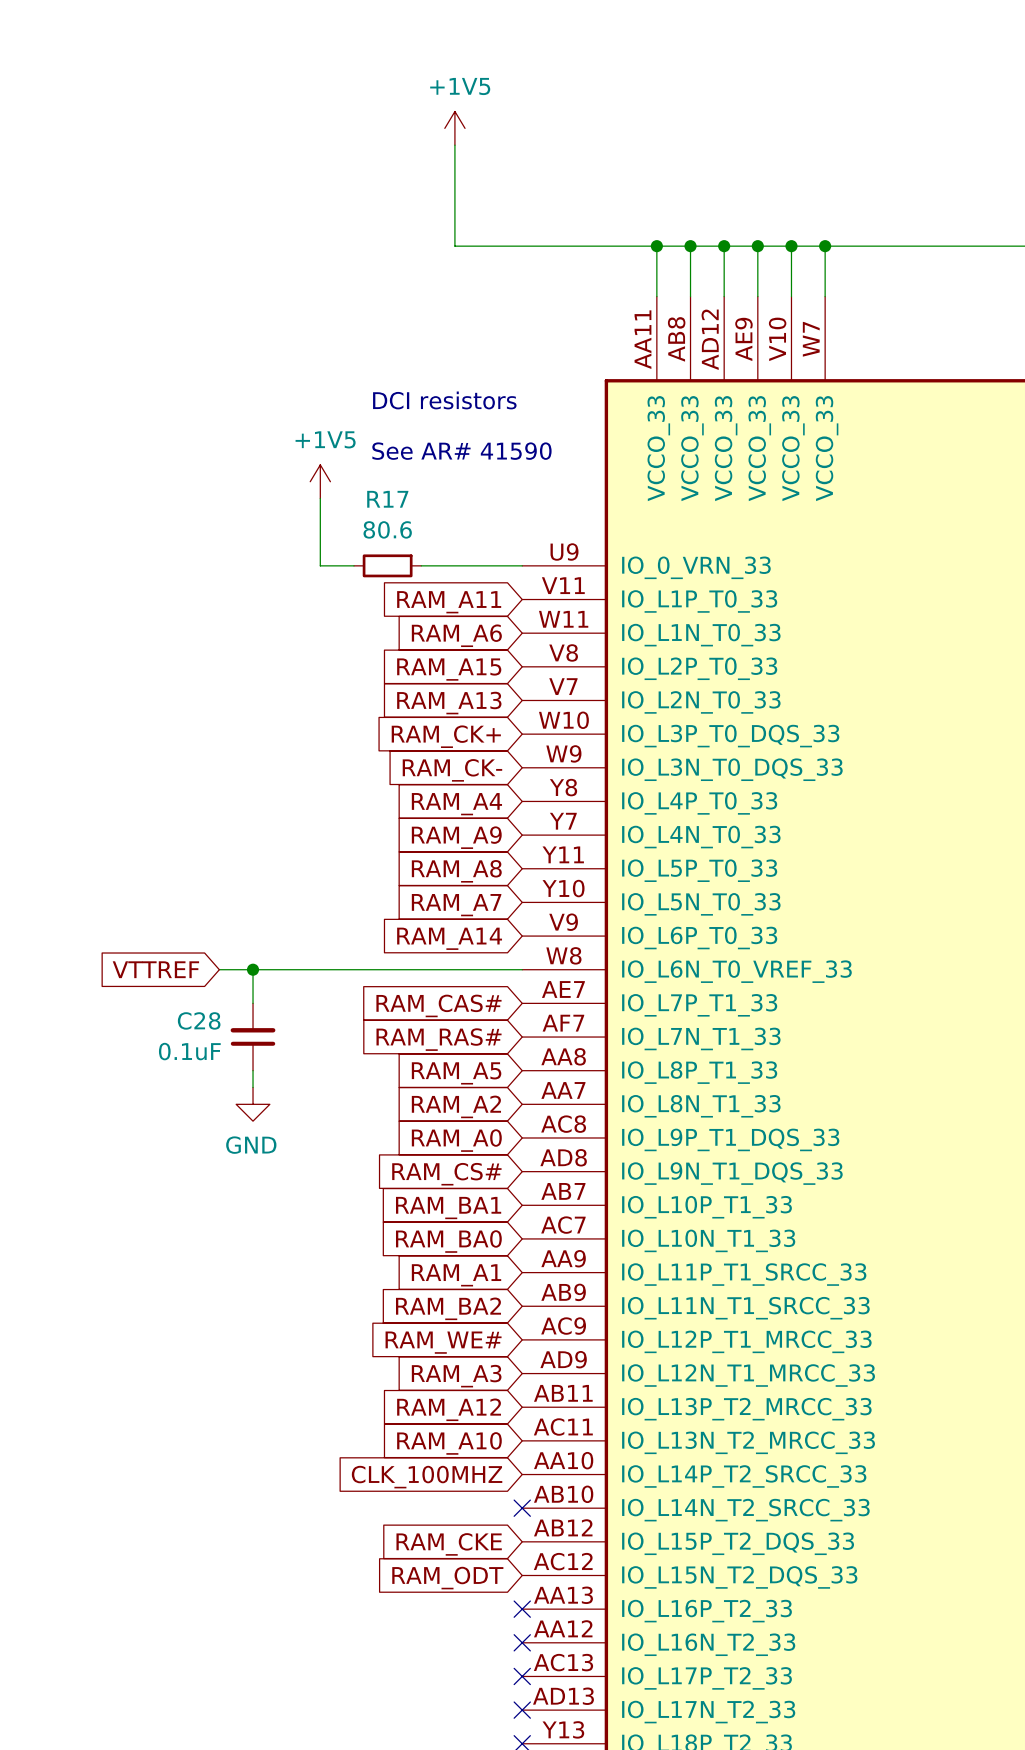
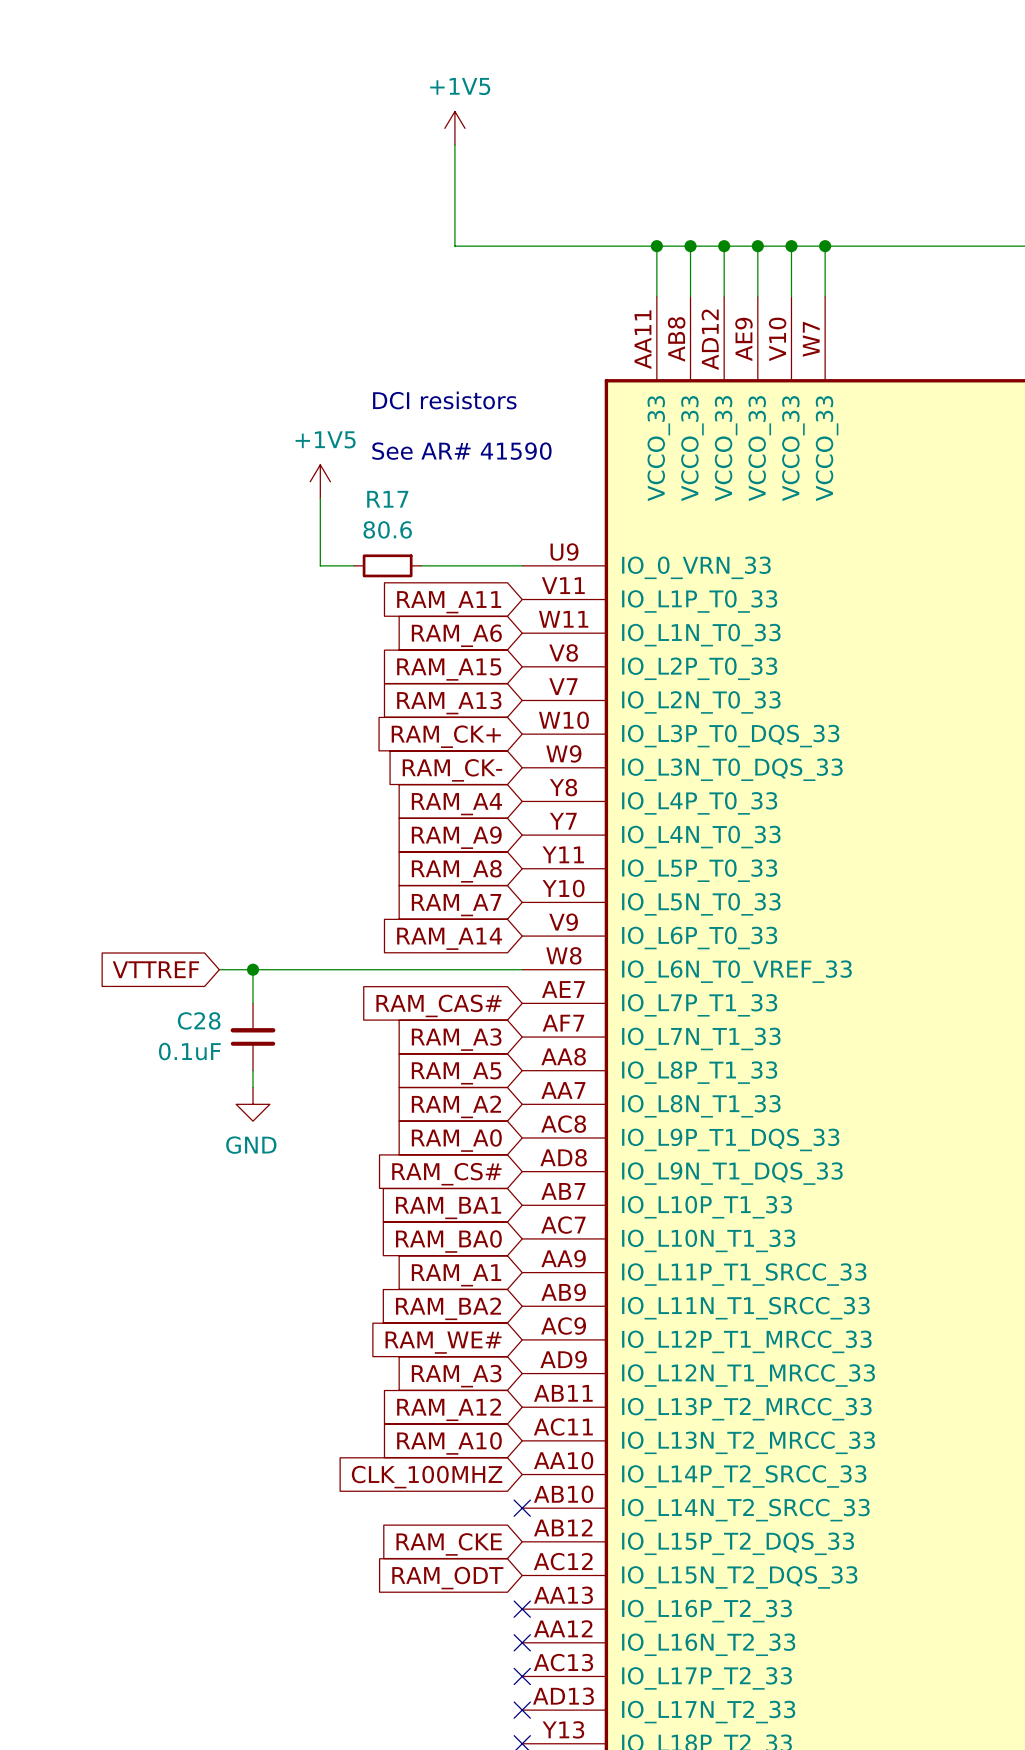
global label: RAM_RAS# (439, 1039) -> RAM_A3 (456, 1039)

